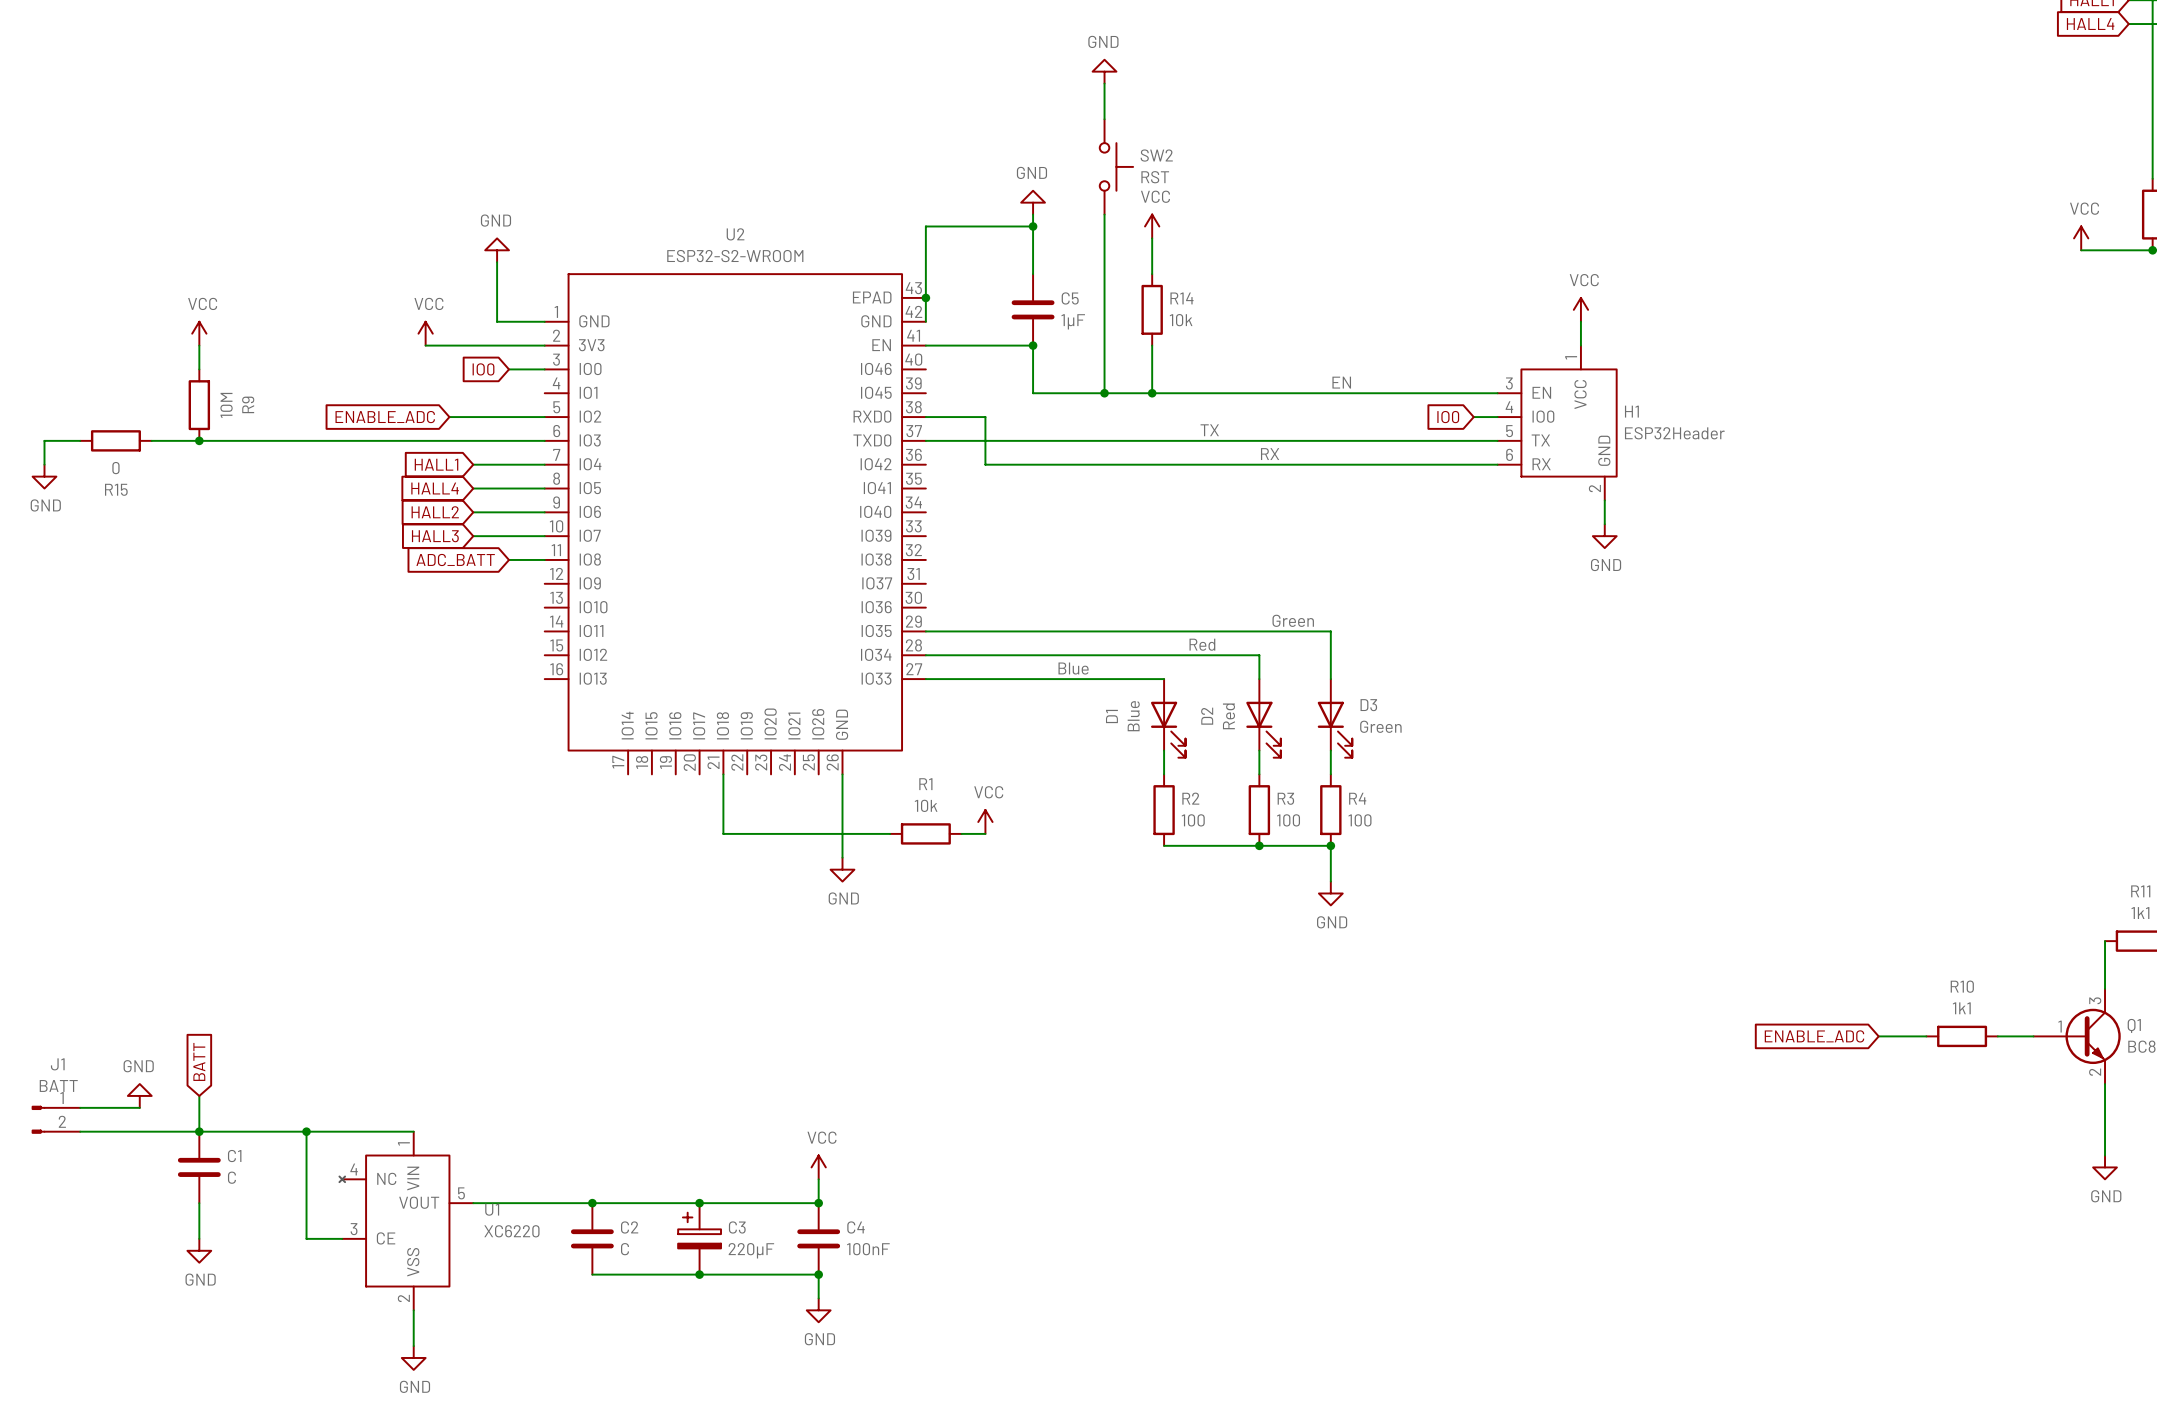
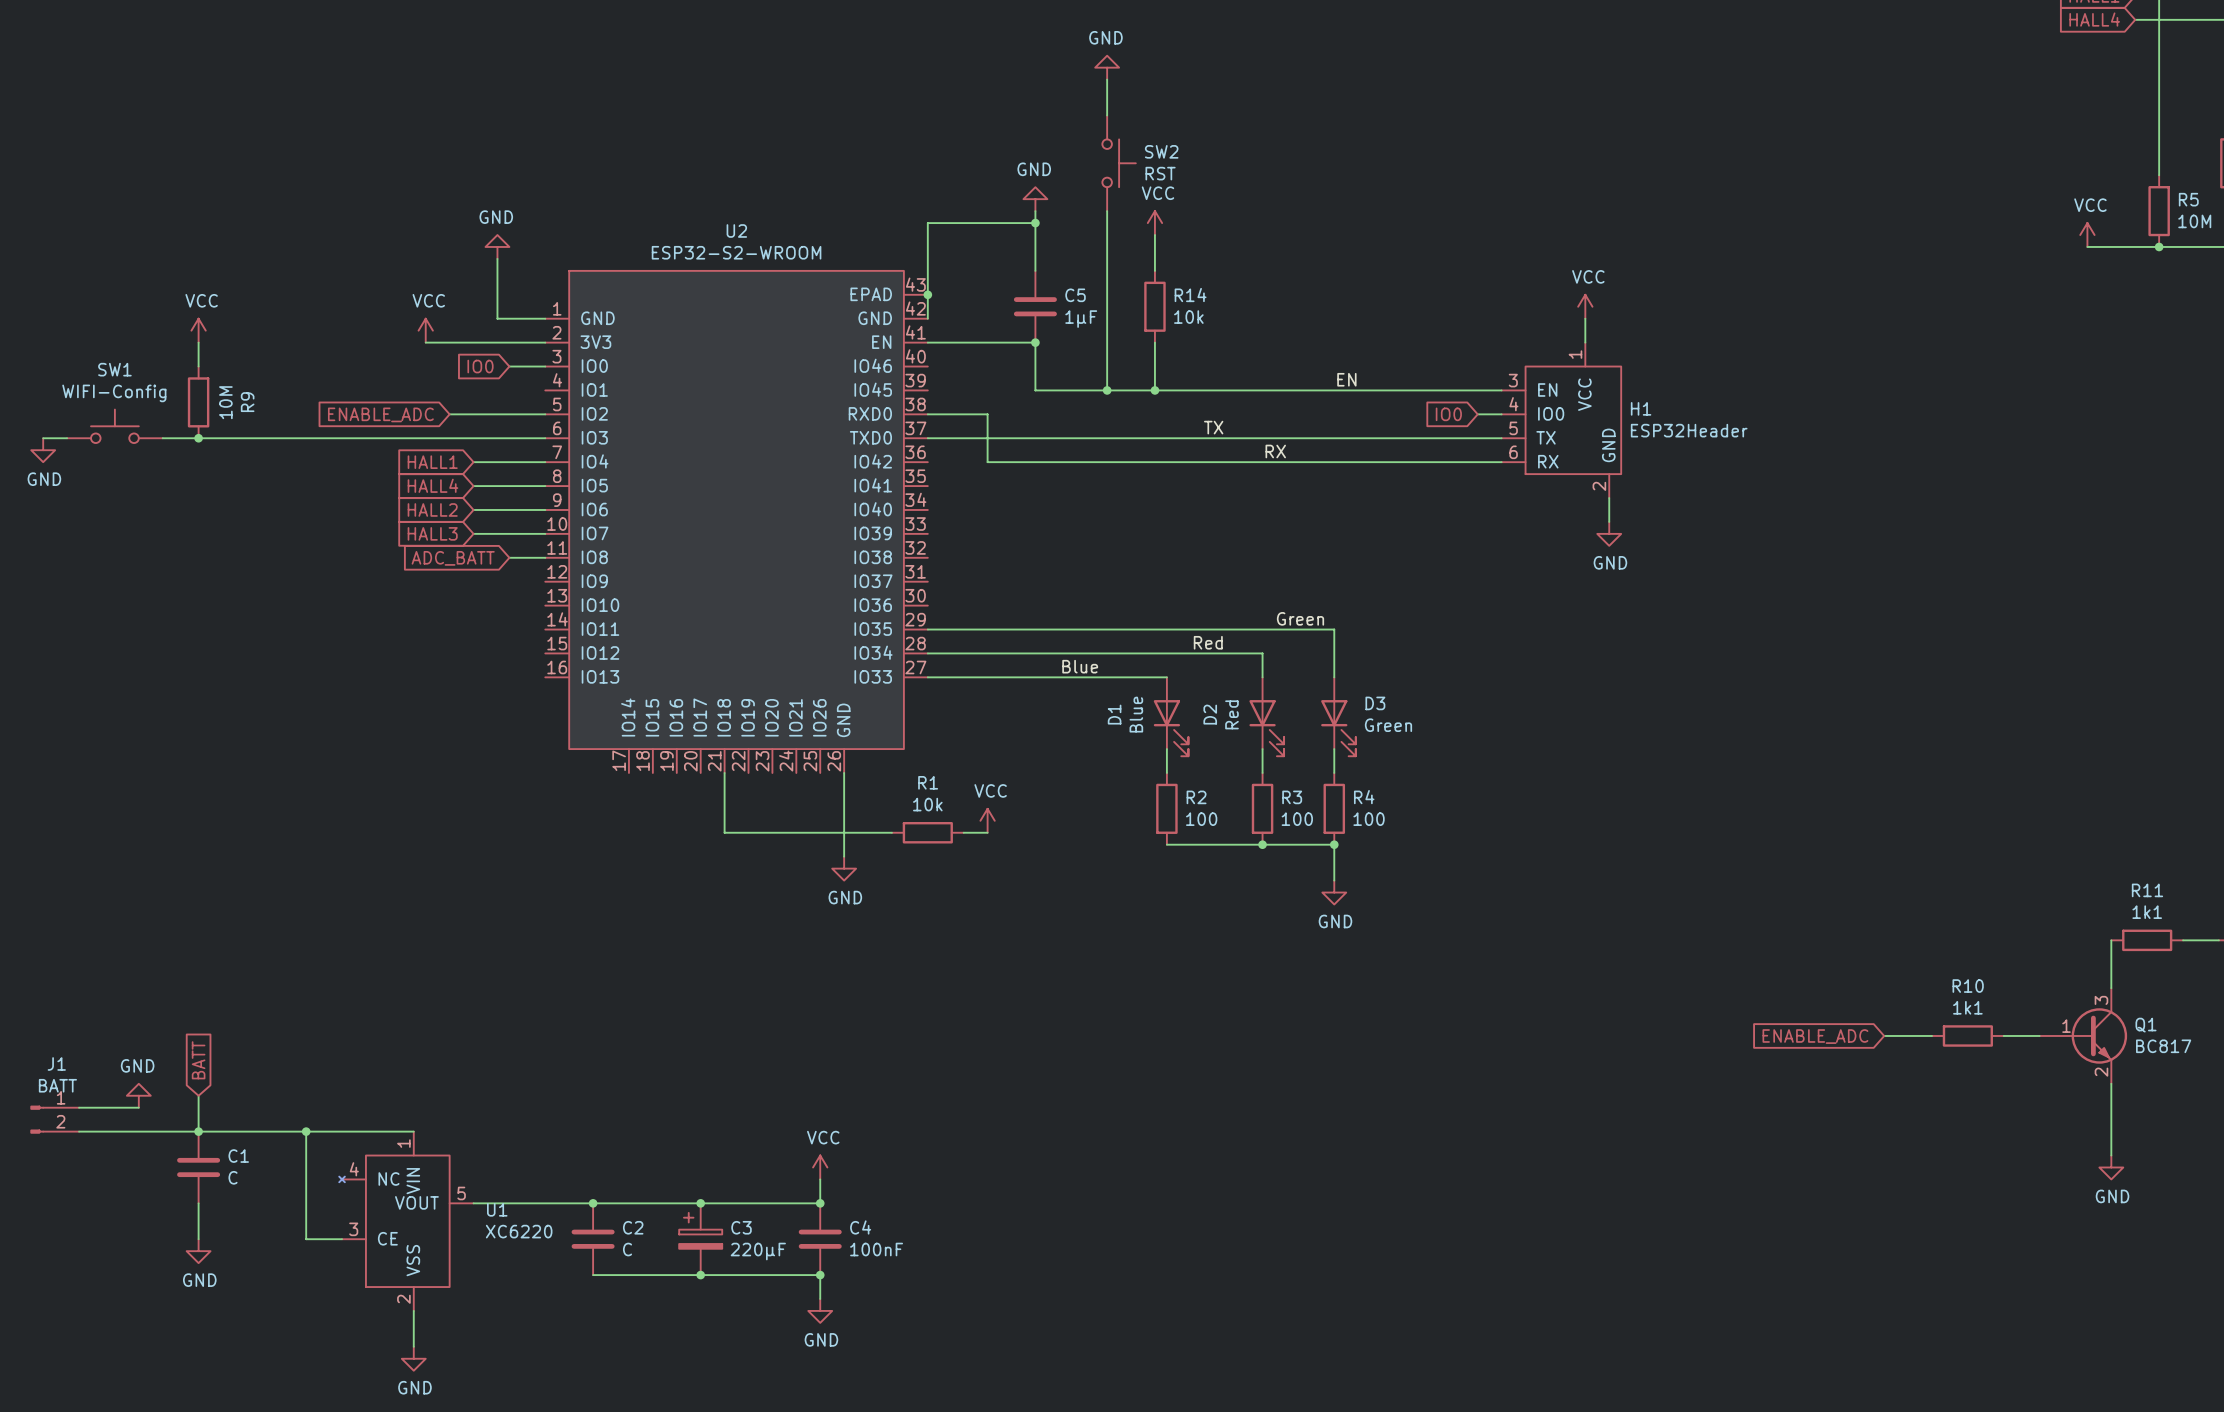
SW1: none -> WIFI-Config (114, 426)
R15: 0 (115, 440) -> none
power symbol position: GND (44, 476) -> GND (43, 450)

